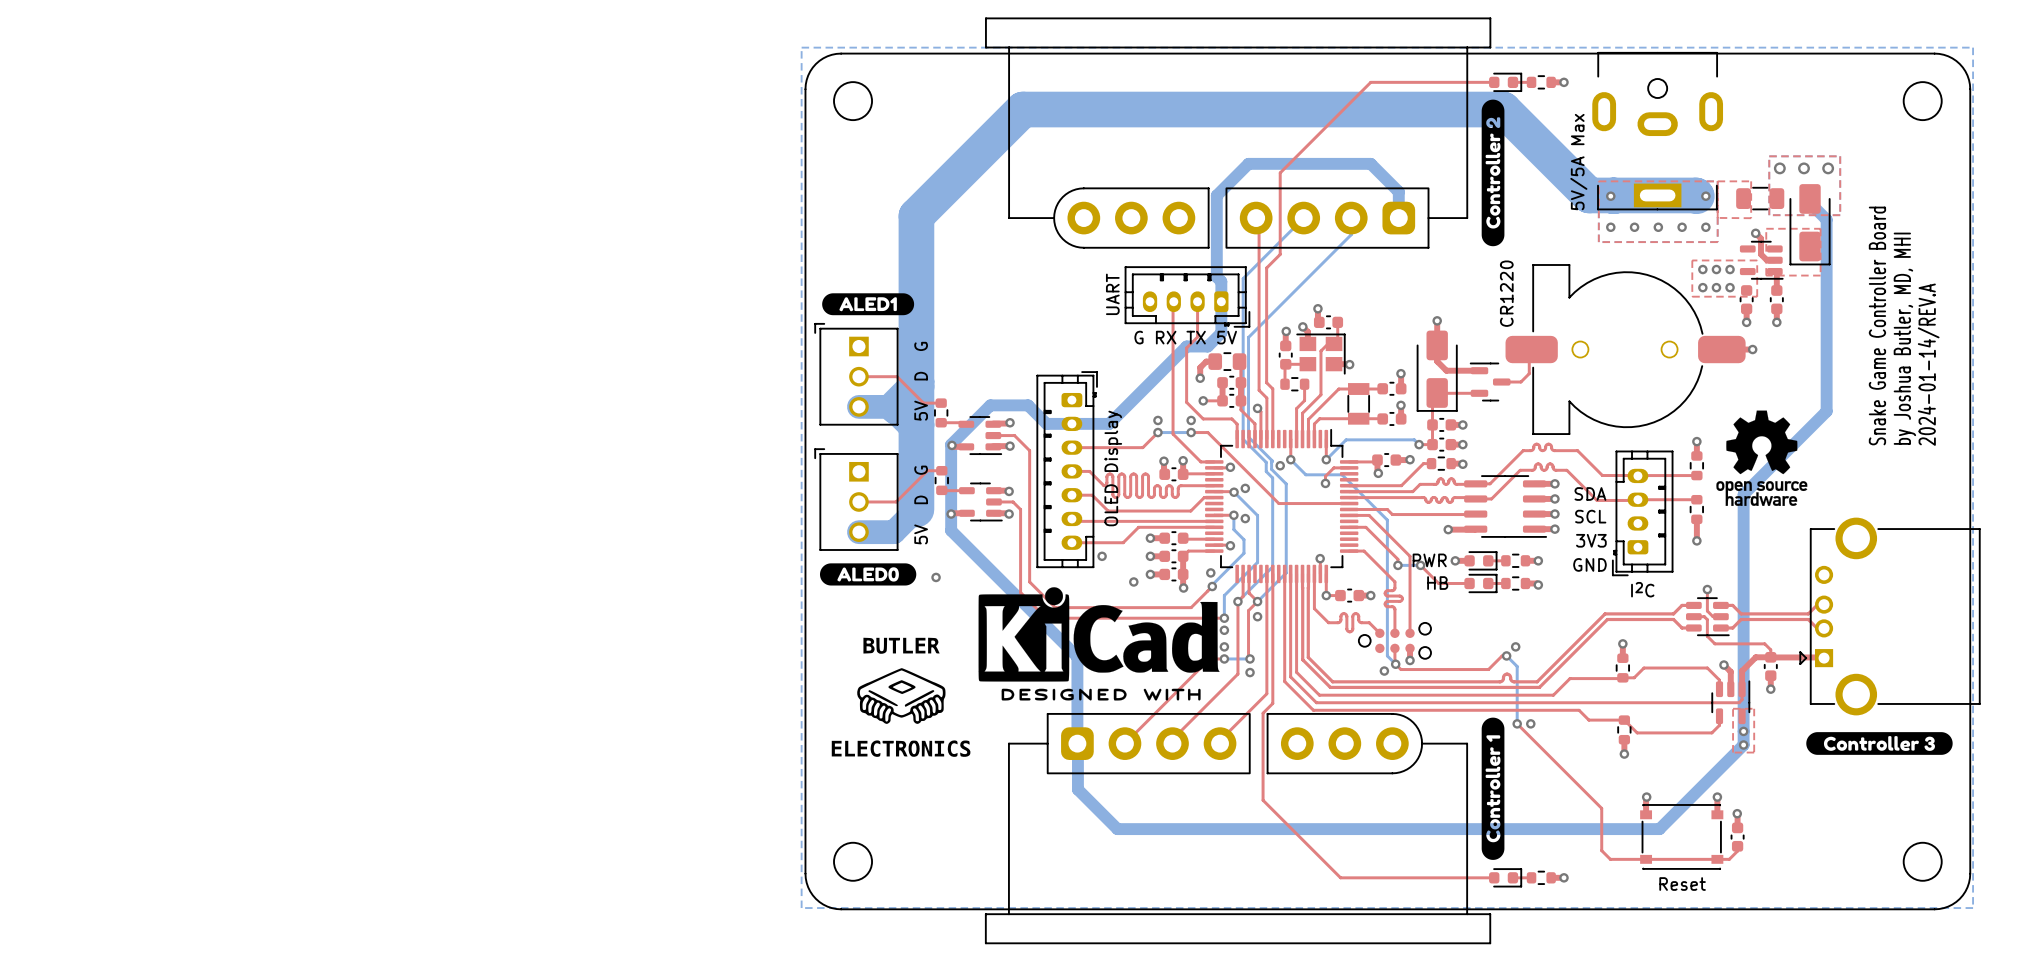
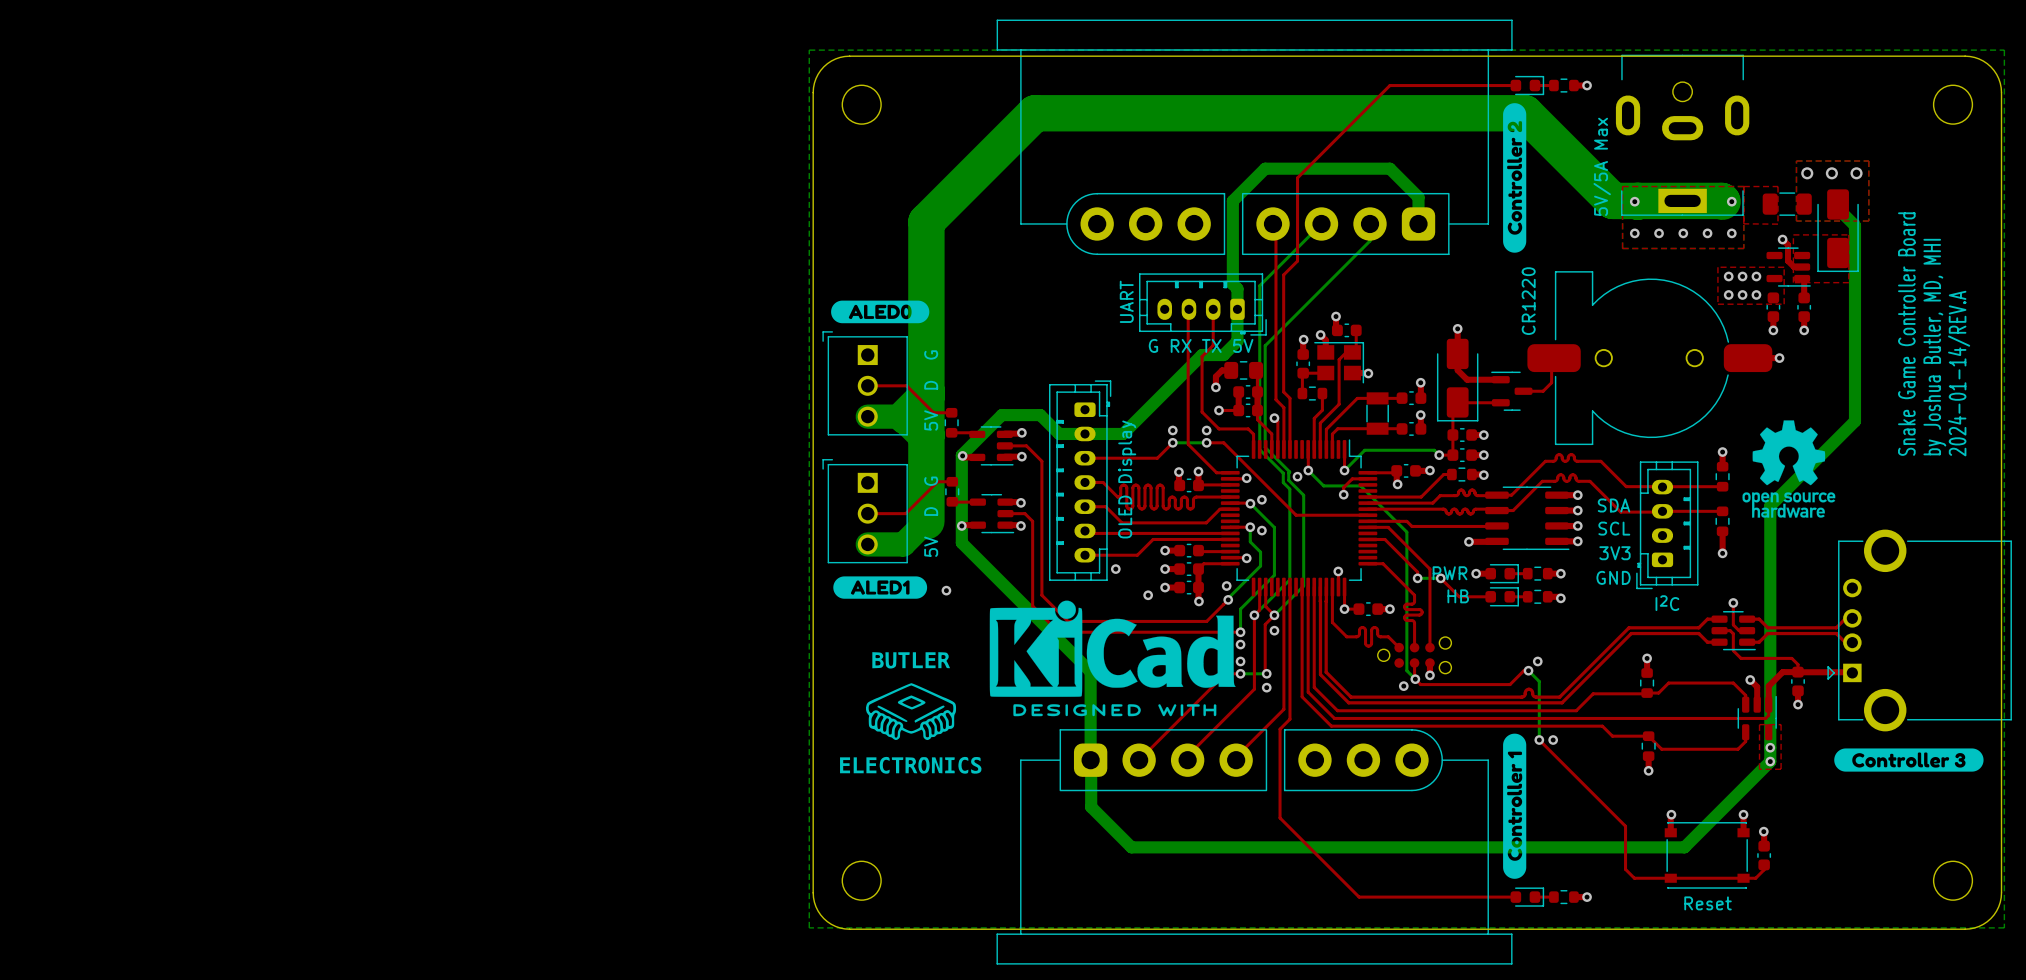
drawing position: (868, 304) -> (880, 587)
drawing position: (868, 574) -> (880, 311)

